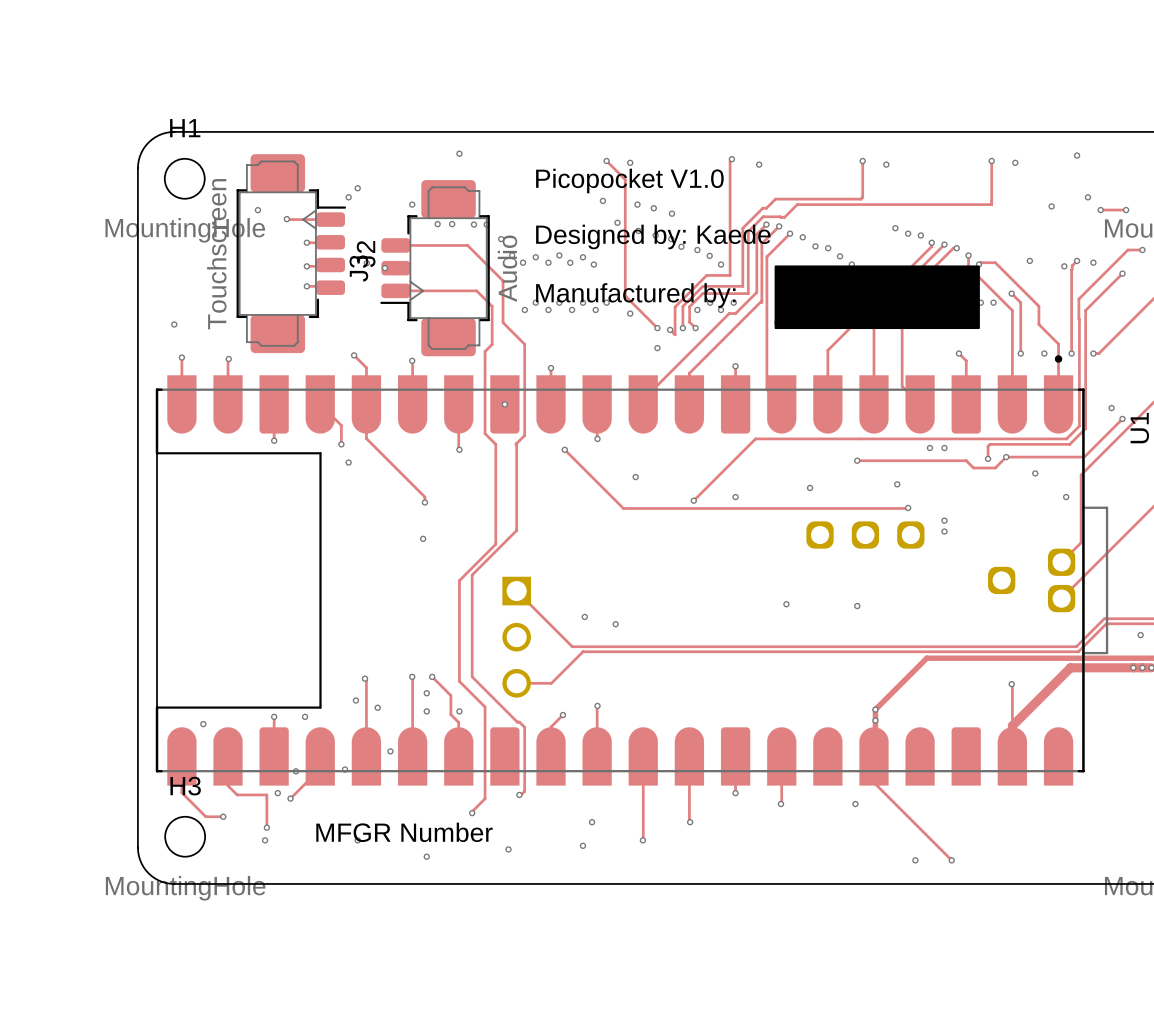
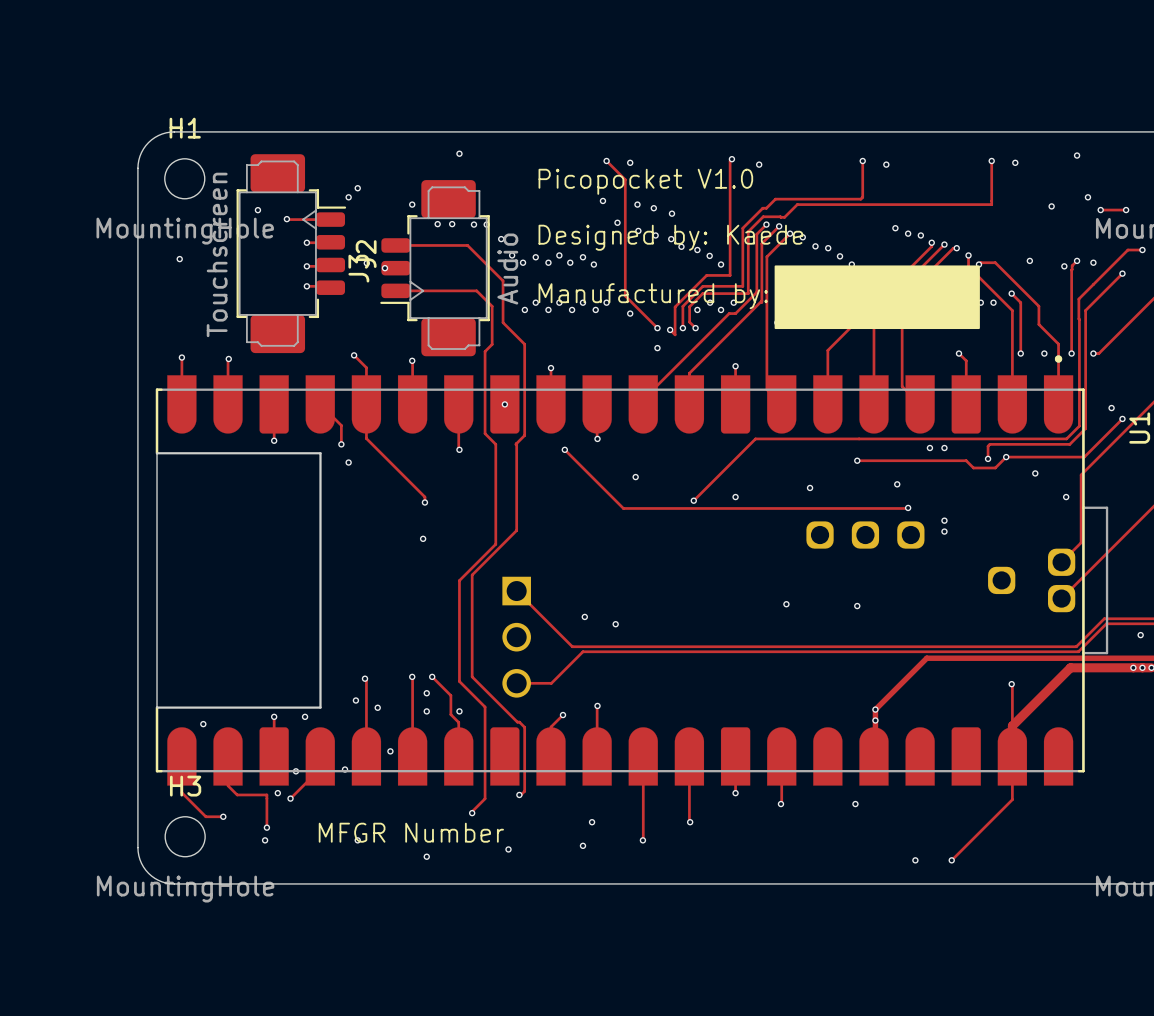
via position: (174, 324) -> (179, 259)
track: (873, 756) (873, 782) (951, 860) -> (1012, 756) (1012, 799) (951, 860)

